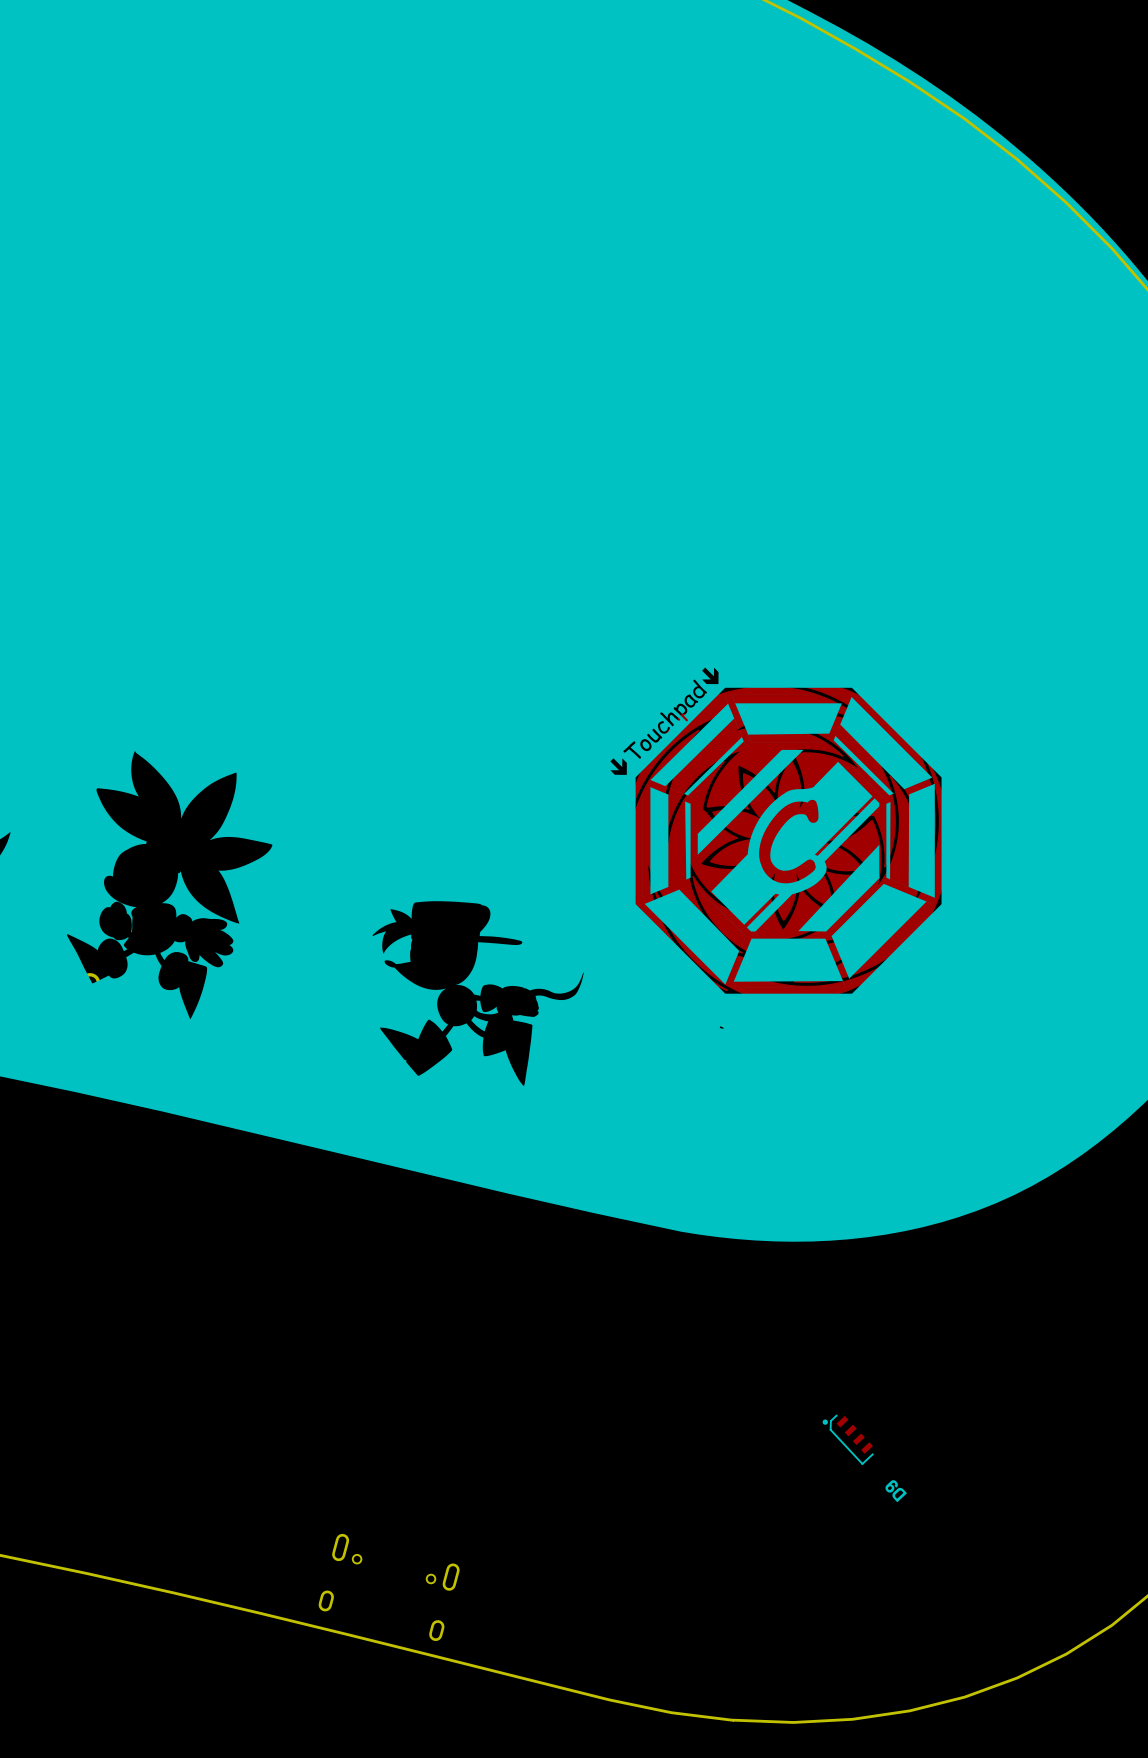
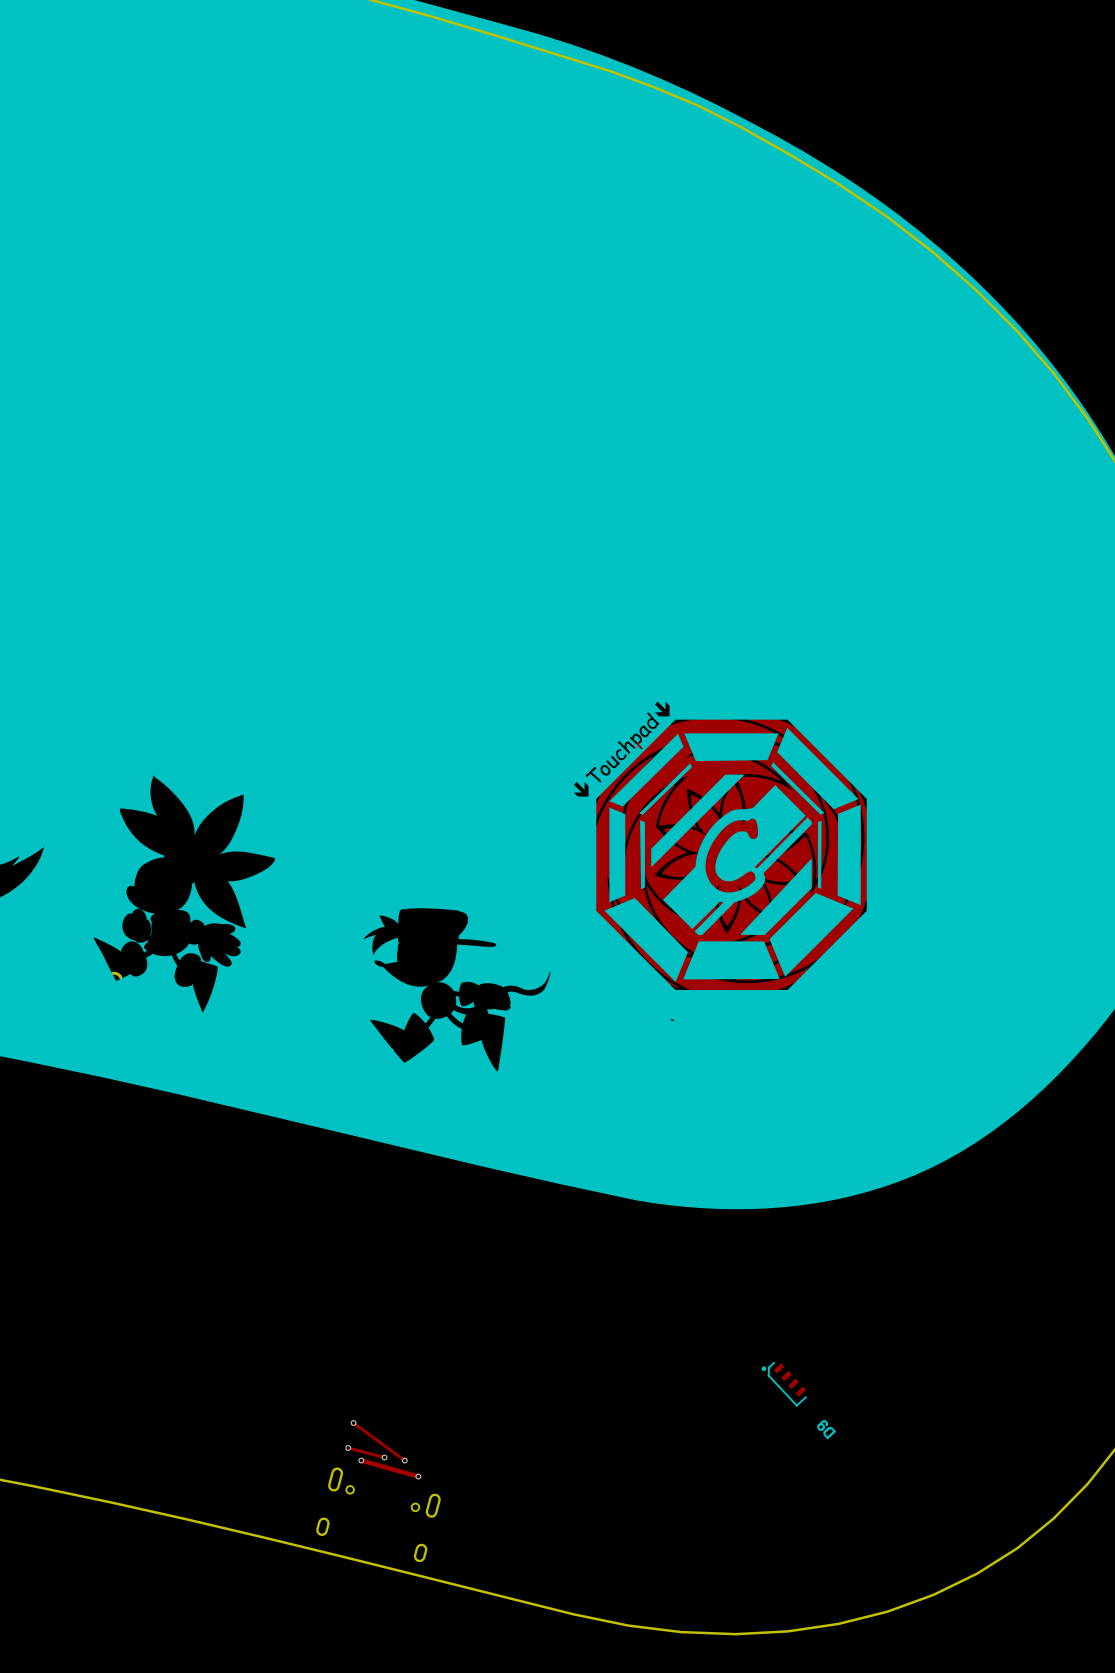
track: none -> (353, 1423) (404, 1460)
via: none -> (353, 1423)
track: none -> (348, 1448) (384, 1457)
via: none -> (348, 1448)
via: none -> (384, 1457)
track: none -> (361, 1460) (418, 1476)
via: none -> (361, 1460)
via: none -> (404, 1460)
via: none -> (418, 1476)

